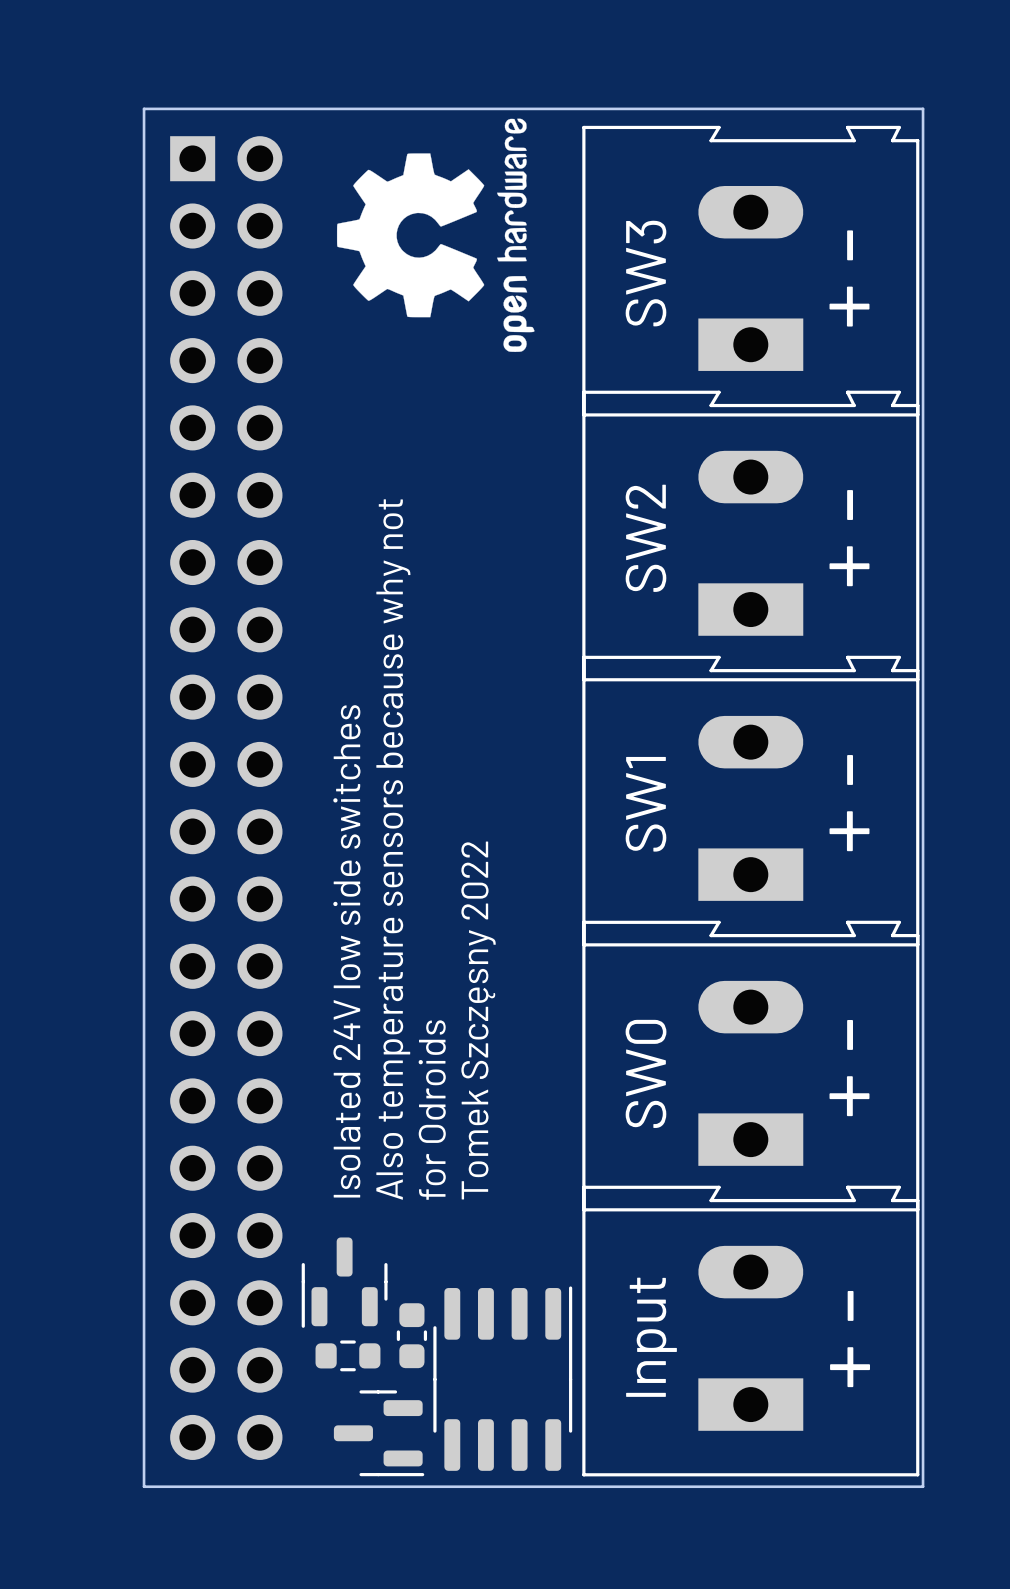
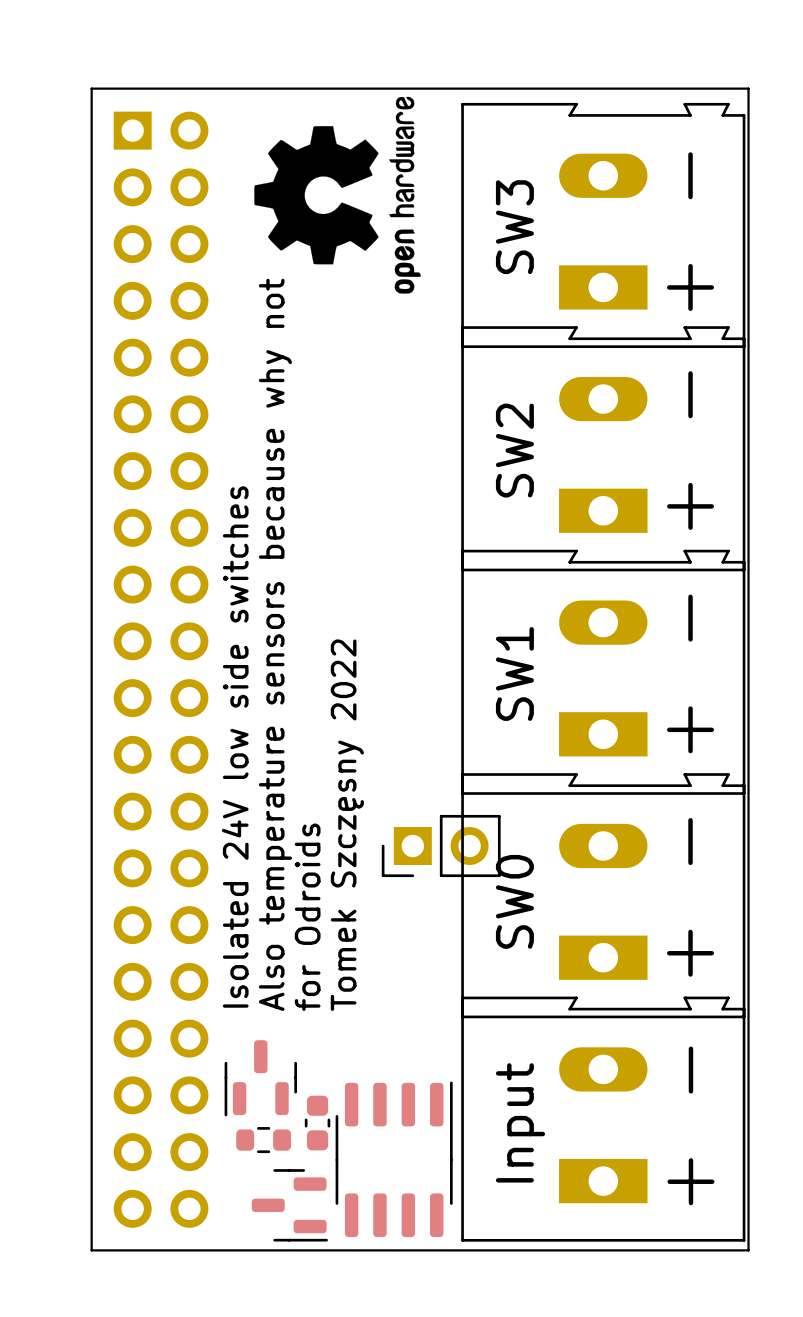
text: Also temperature sensors because why not (393, 849) -> for Odroids (307, 917)
text: Isolated 24V low side switches (346, 951) -> Also temperature sensors because why not (275, 644)
text: none -> Isolated 24V low side switches (235, 746)
part: none -> (441, 846)
text: Tomek Szczęsny 2022 (478, 1020) -> none
text: for Odroids (432, 1110) -> Tomek Szczęsny 2022 (347, 825)

